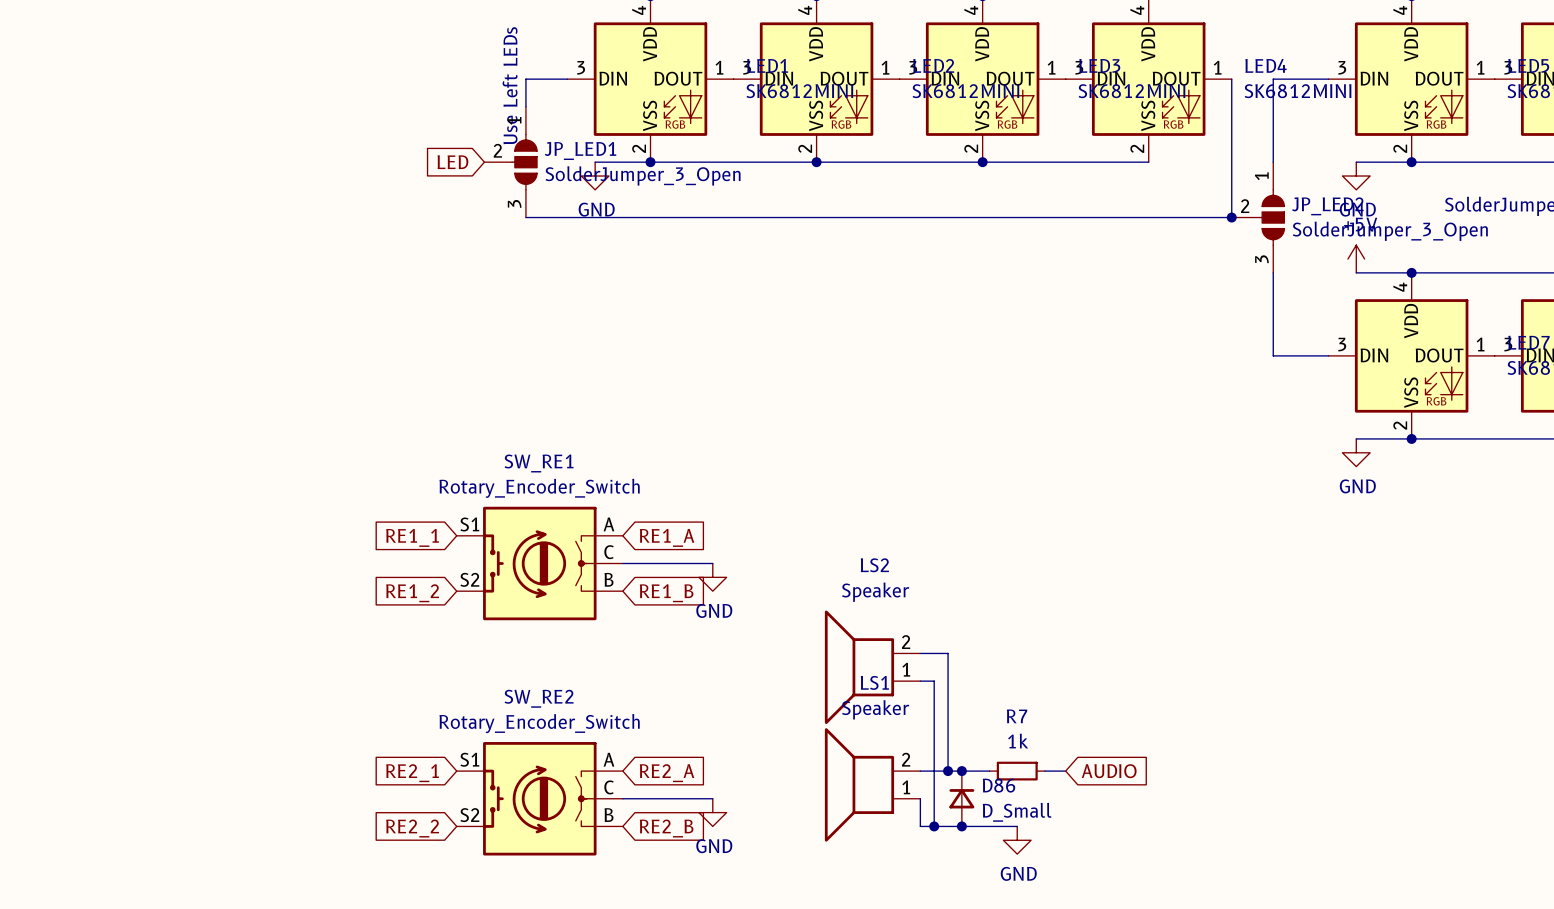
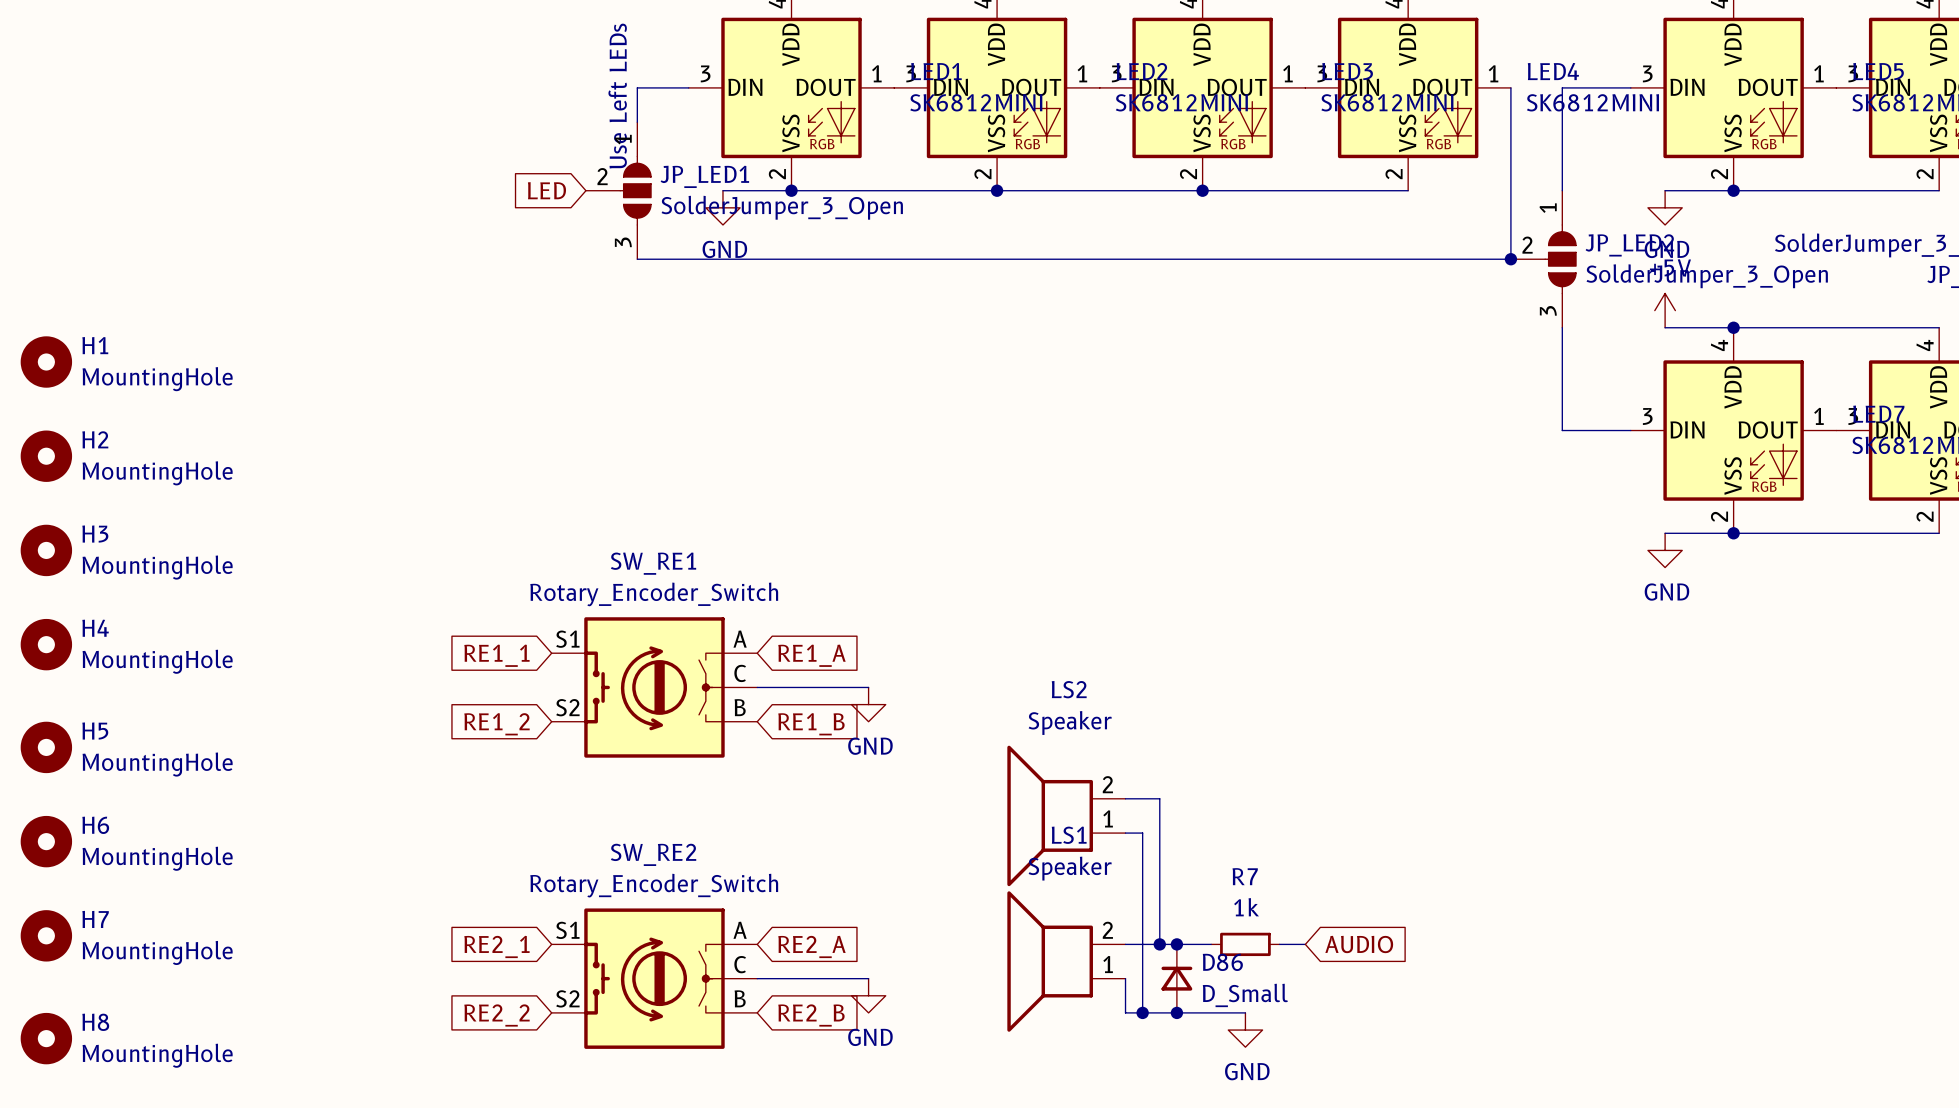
H1: none -> MountingHole (46, 362)
H2: none -> MountingHole (46, 456)
H3: none -> MountingHole (46, 550)
H4: none -> MountingHole (46, 644)
H5: none -> MountingHole (46, 747)
H6: none -> MountingHole (46, 841)
H7: none -> MountingHole (46, 935)
H8: none -> MountingHole (46, 1038)

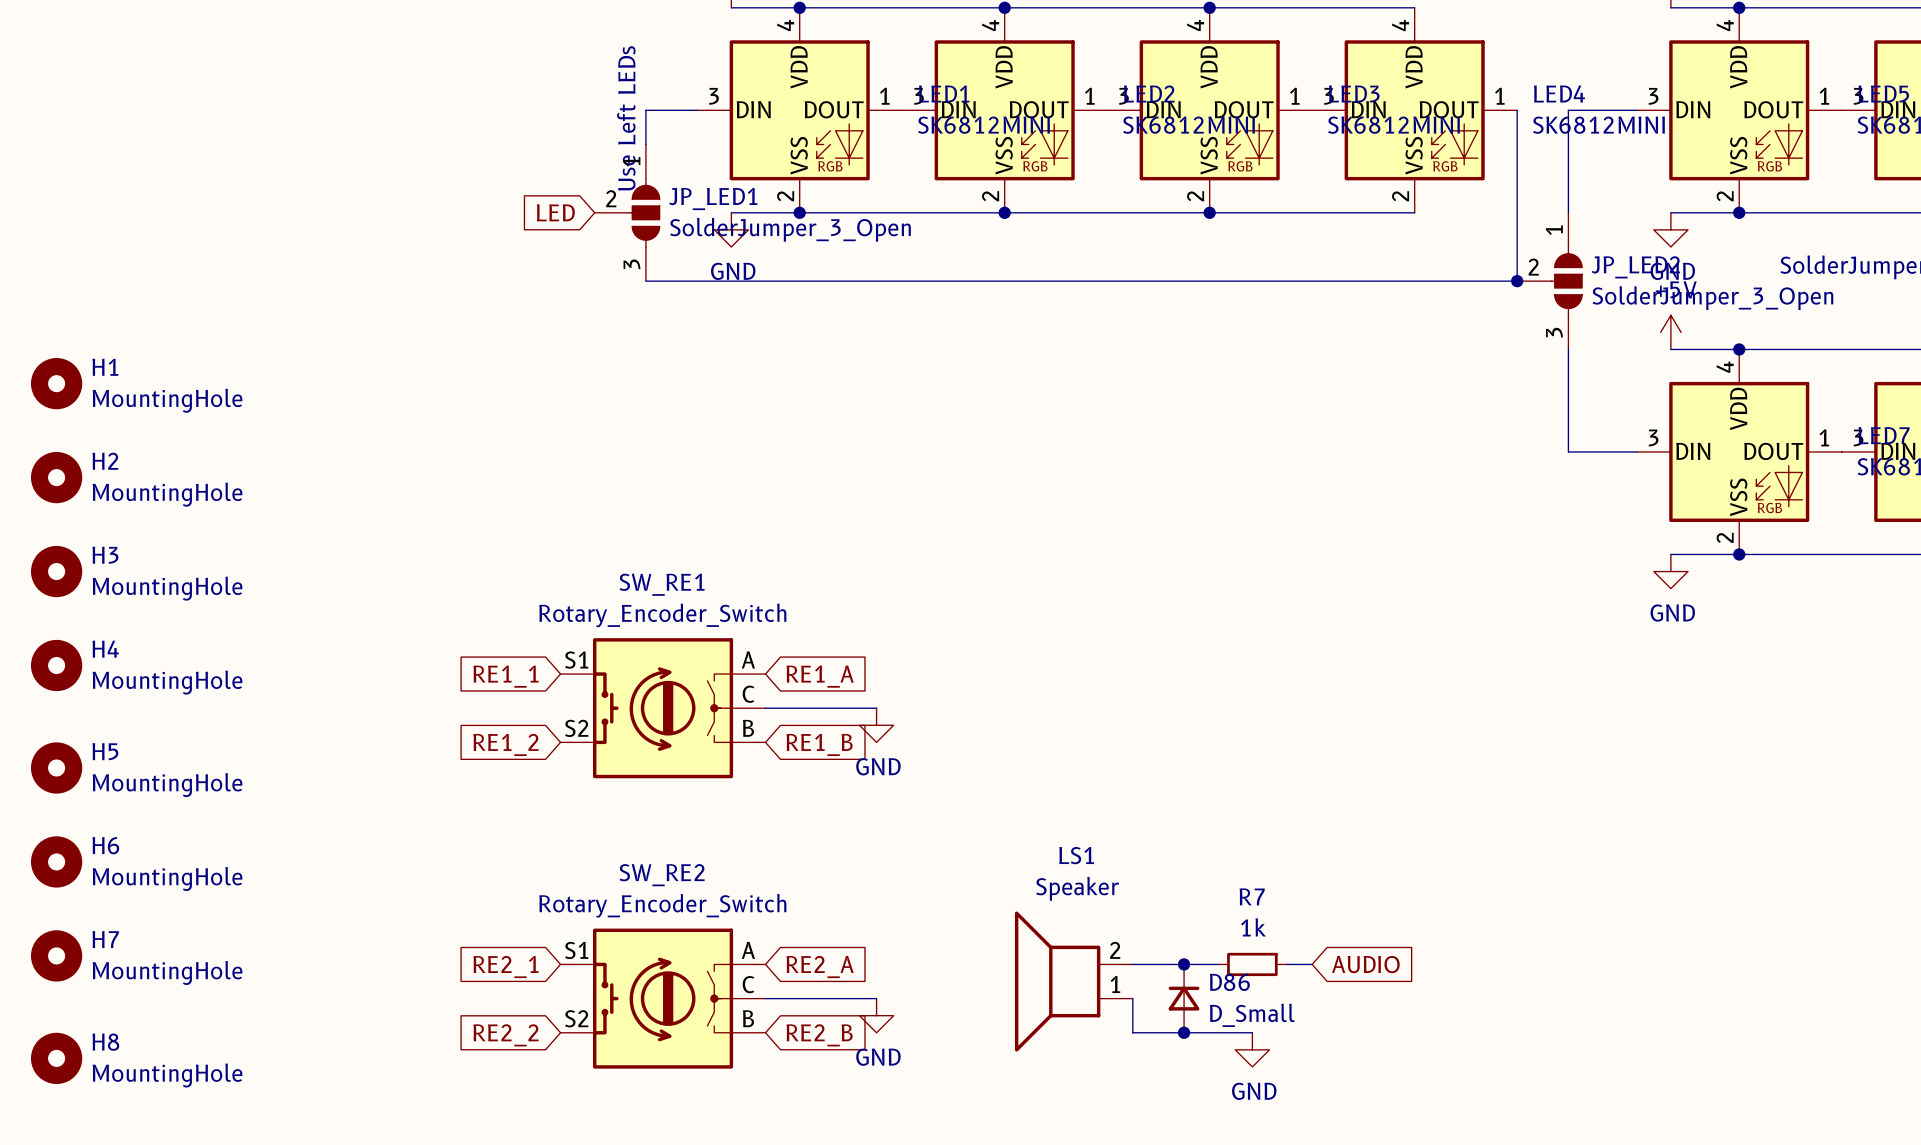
wire: (1125, 798) (1159, 798) (1159, 944) -> none
LS2: Speaker (1066, 815) -> none
wire: (1125, 833) (1142, 833) (1142, 1012) -> none
junction: (1159, 944) -> none
junction: (1142, 1012) -> none

